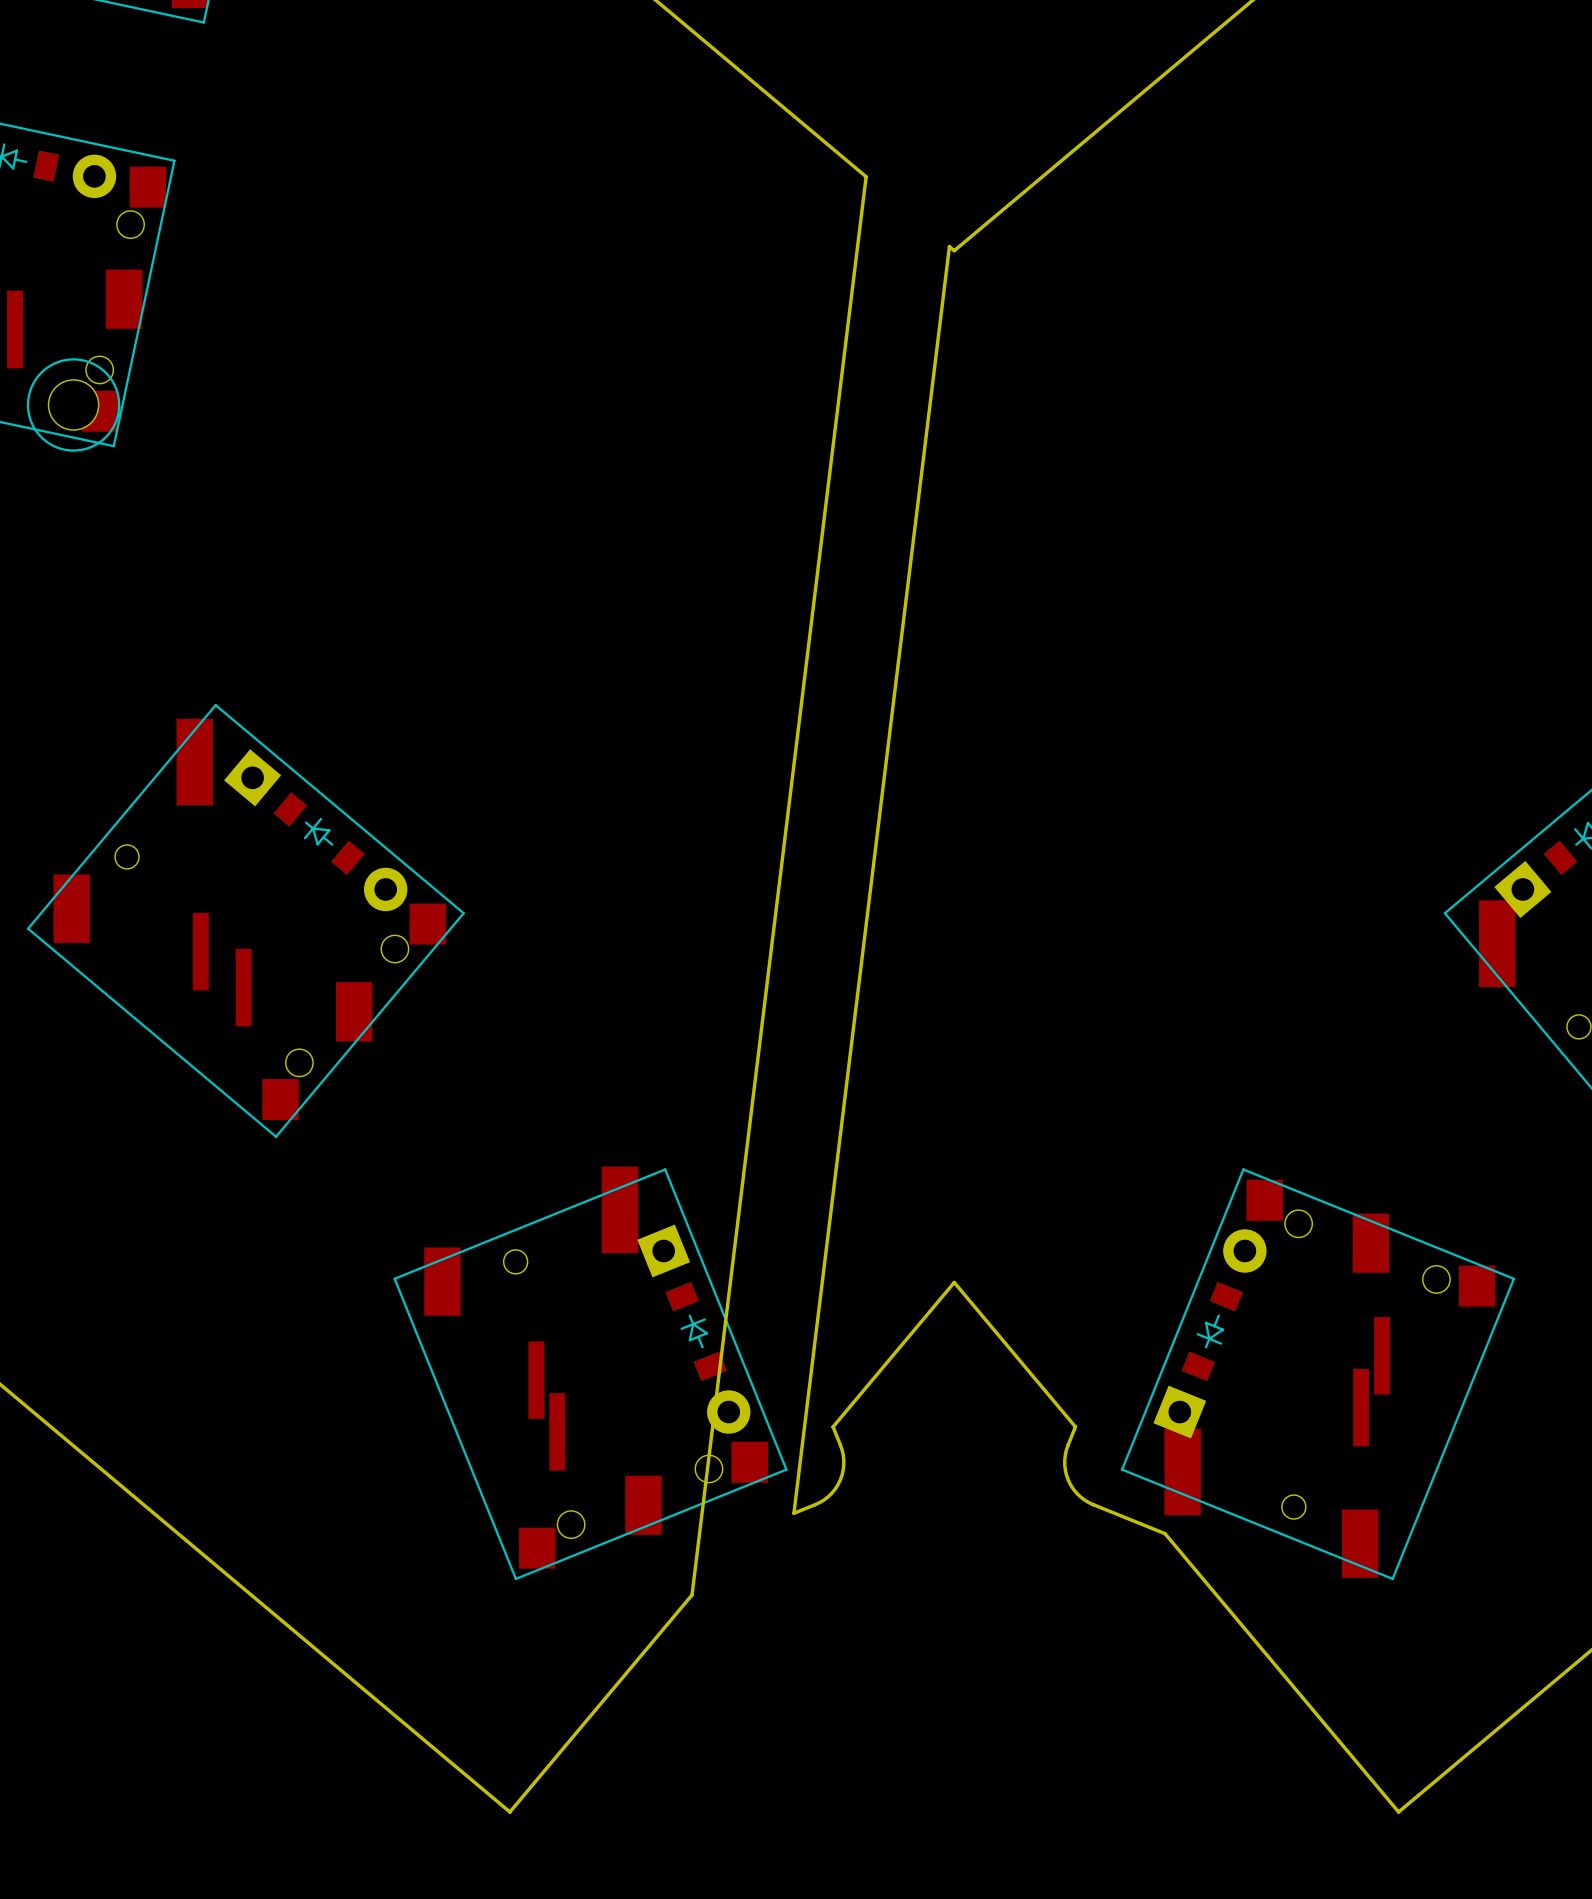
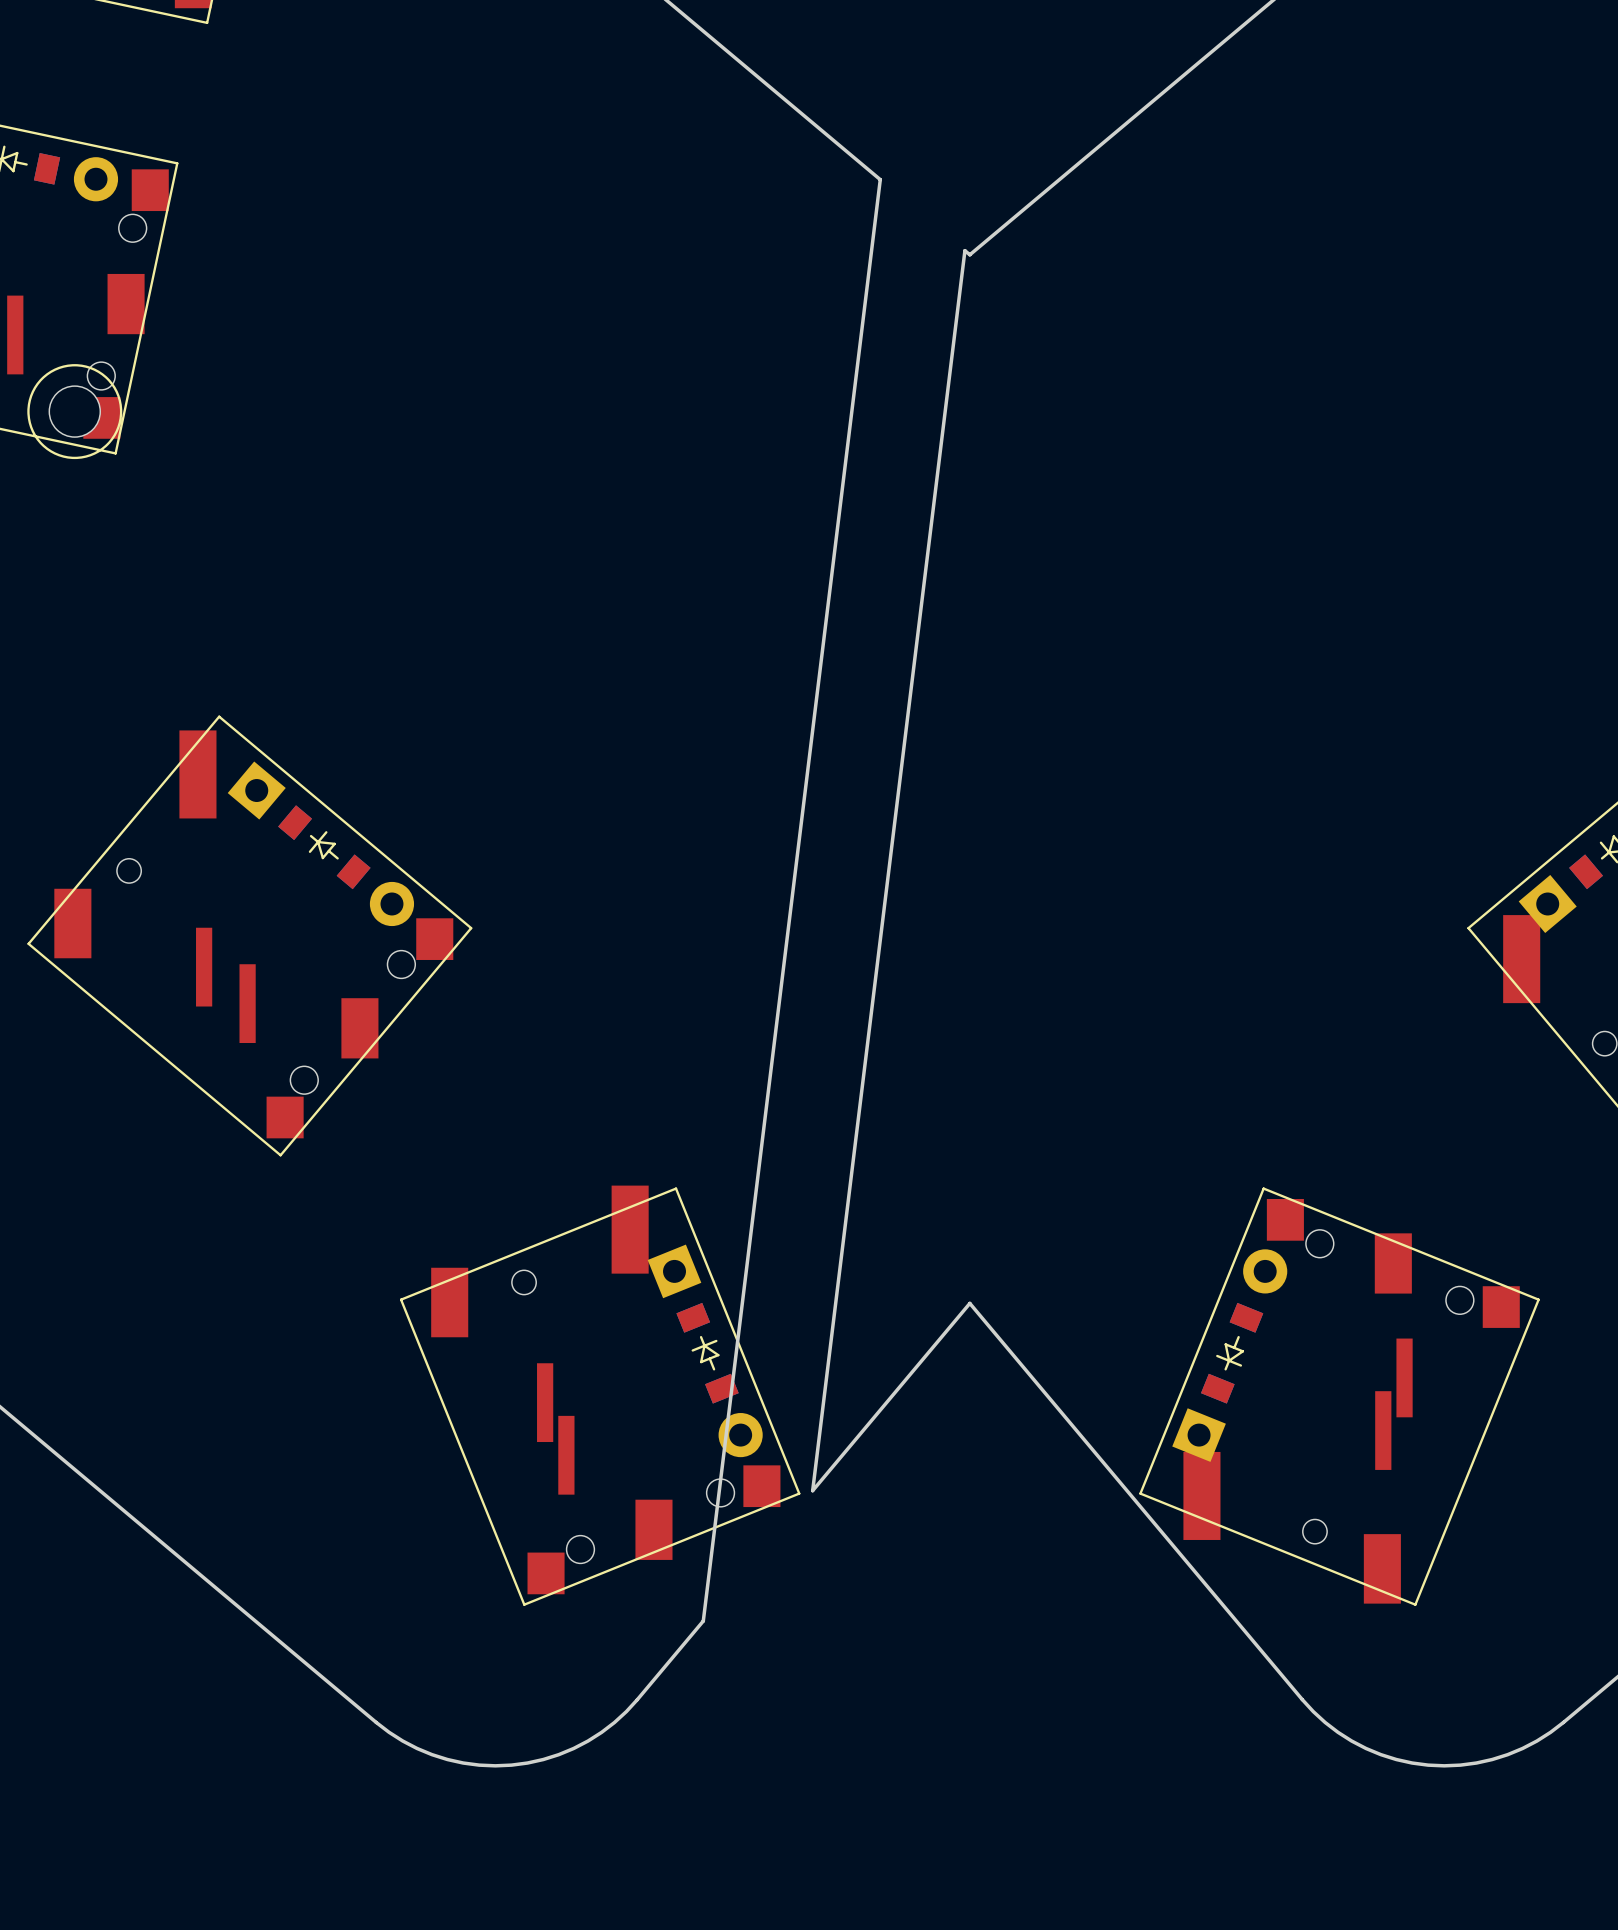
board edge: (833, 1426) (843, 1455) (843, 1470) (840, 1480) (835, 1489) (824, 1499) (793, 1513) (799, 1466) -> (846, 1450) (812, 1490)
board edge: (1075, 1426) (1066, 1450) (1064, 1465) (1068, 1480) (1076, 1493) (1093, 1504) (1165, 1533) -> (1093, 1450) (1184, 1558)
board edge: (627, 1672) (509, 1812) (370, 1694) -> (637, 1699) (614, 1722) (588, 1741) (558, 1754) (511, 1765) (479, 1765) (432, 1754) (402, 1741) (376, 1722)
board edge: (1281, 1672) (1398, 1812) (1538, 1694) -> (1302, 1699) (1338, 1732) (1365, 1748) (1396, 1759) (1428, 1765) (1460, 1765) (1507, 1754) (1536, 1741) (1563, 1722)

